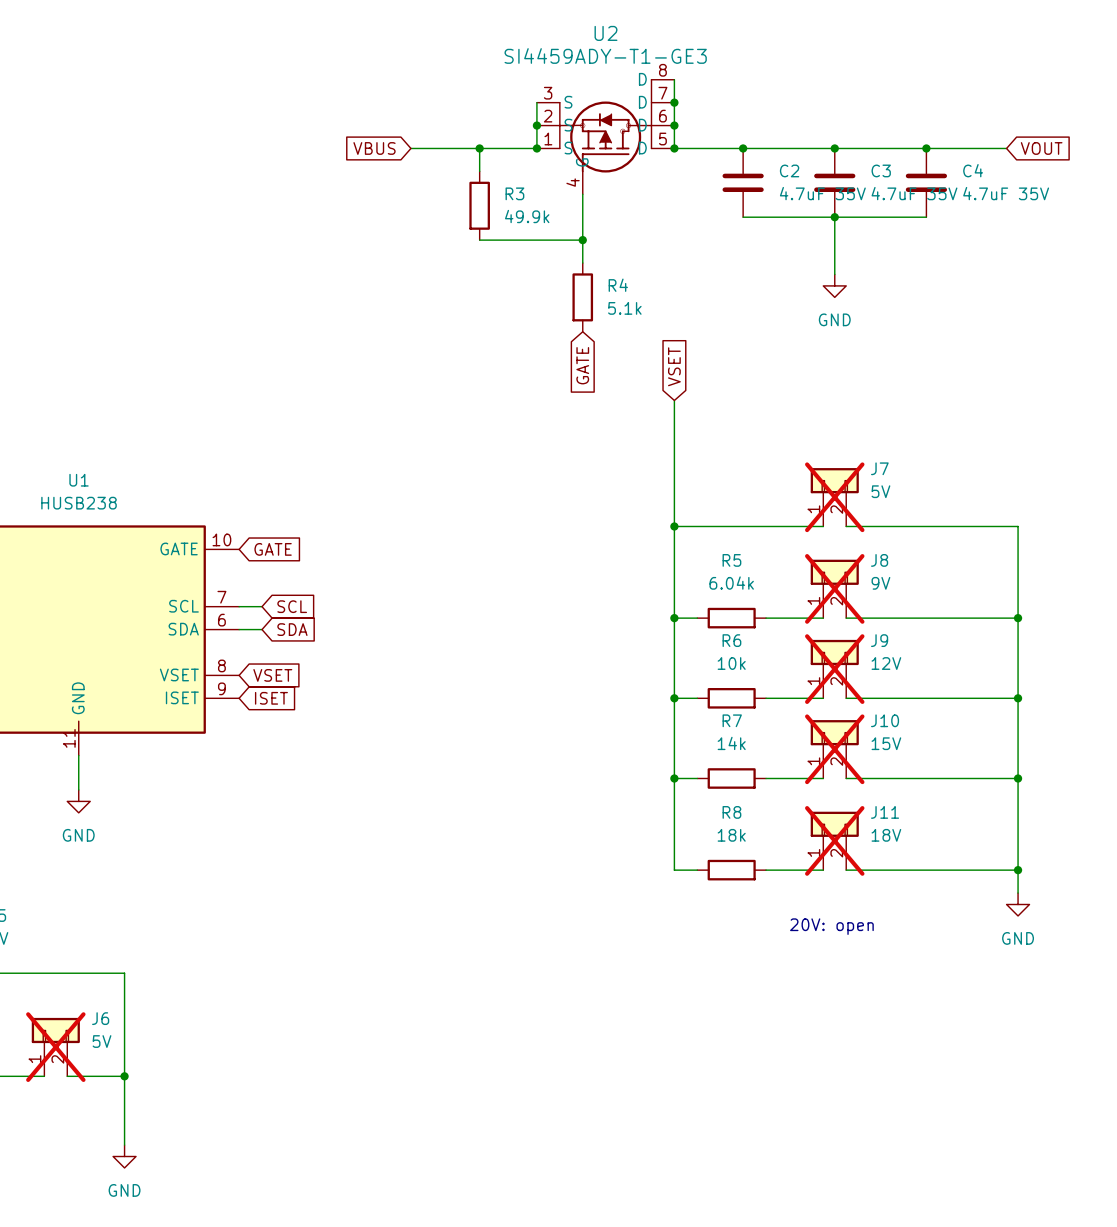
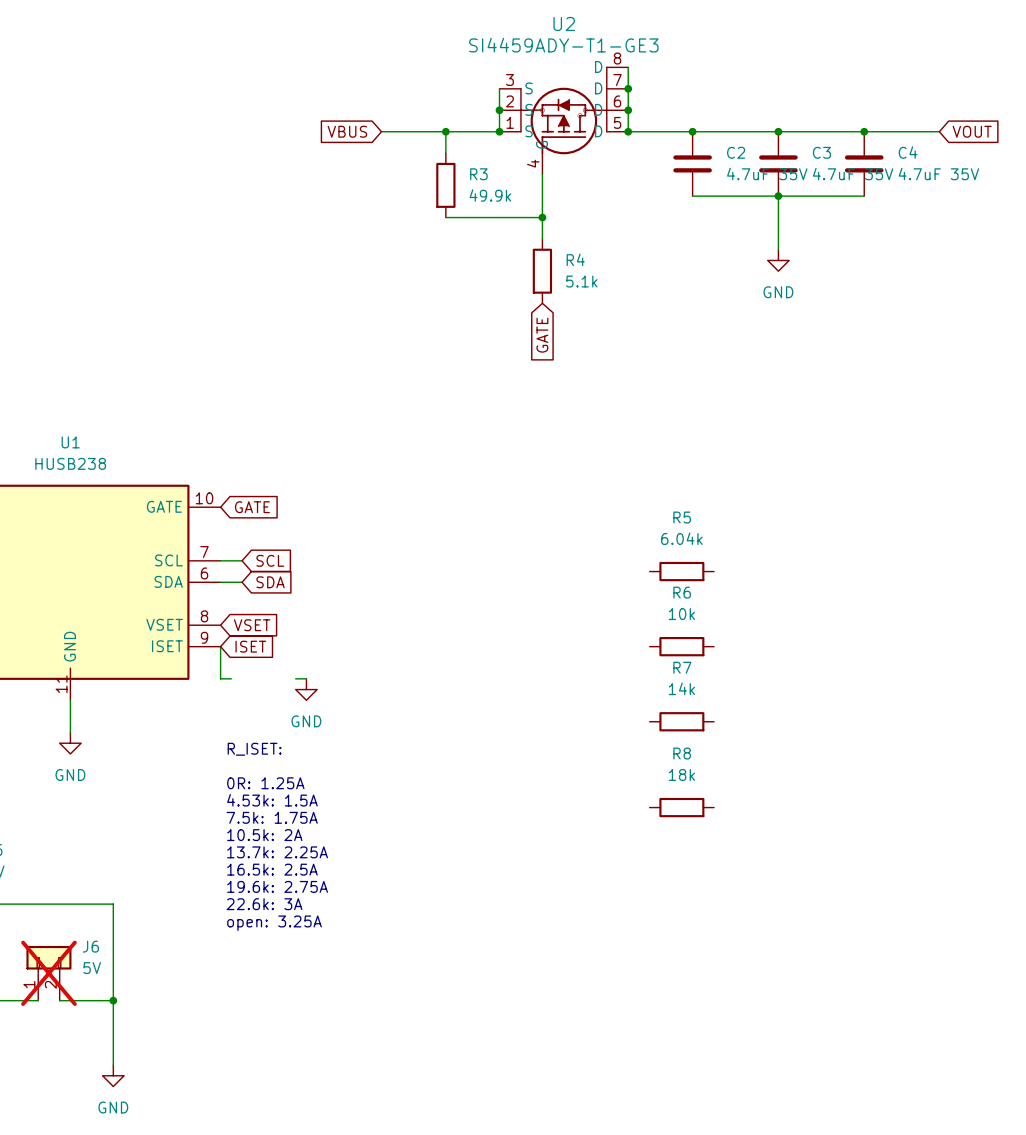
global label: VSET (674, 366) -> none
wire: (674, 400) (674, 870) (697, 870) -> none
J7: 5V (834, 497) -> none
wire: (674, 526) (823, 526) -> none
junction: (674, 526) -> none
wire: (846, 526) (1018, 526) (1018, 893) -> none
J8: 9V (834, 588) -> none
wire: (674, 618) (697, 618) -> none
junction: (674, 618) -> none
wire: (766, 618) (823, 618) -> none
wire: (846, 618) (1018, 618) -> none
junction: (1018, 618) -> none
J9: 12V (834, 669) -> none
wire: none -> (220, 646) (220, 678) (231, 678)
wire: (674, 698) (697, 698) -> none
junction: (674, 698) -> none
wire: (766, 698) (823, 698) -> none
wire: (846, 698) (1018, 698) -> none
junction: (1018, 698) -> none
wire: none -> (295, 678) (306, 678)
power symbol: none -> GND (306, 689)
J10: 15V (834, 749) -> none
wire: (674, 778) (697, 778) -> none
junction: (674, 778) -> none
wire: (766, 778) (823, 778) -> none
wire: (846, 778) (1018, 778) -> none
junction: (1018, 778) -> none
text: none -> R_ISET: (254, 749)
J11: 18V (834, 840) -> none
text: none -> 0R: 1.25A (265, 783)
text: none -> 4.53k: 1.5A (272, 800)
wire: (766, 870) (823, 870) -> none
wire: (846, 870) (1018, 870) -> none
junction: (1018, 870) -> none
text: none -> 7.5k: 1.75A (272, 817)
text: none -> 10.5k: 2A (264, 835)
power symbol: GND (1018, 904) -> none
text: none -> 13.7k: 2.25A (277, 852)
text: 20V: open (831, 926) -> none
text: none -> 16.5k: 2.5A (272, 869)
text: none -> 19.6k: 2.75A (277, 886)
text: none -> 22.6k: 3A (264, 904)
text: none -> open: 3.25A (274, 923)

